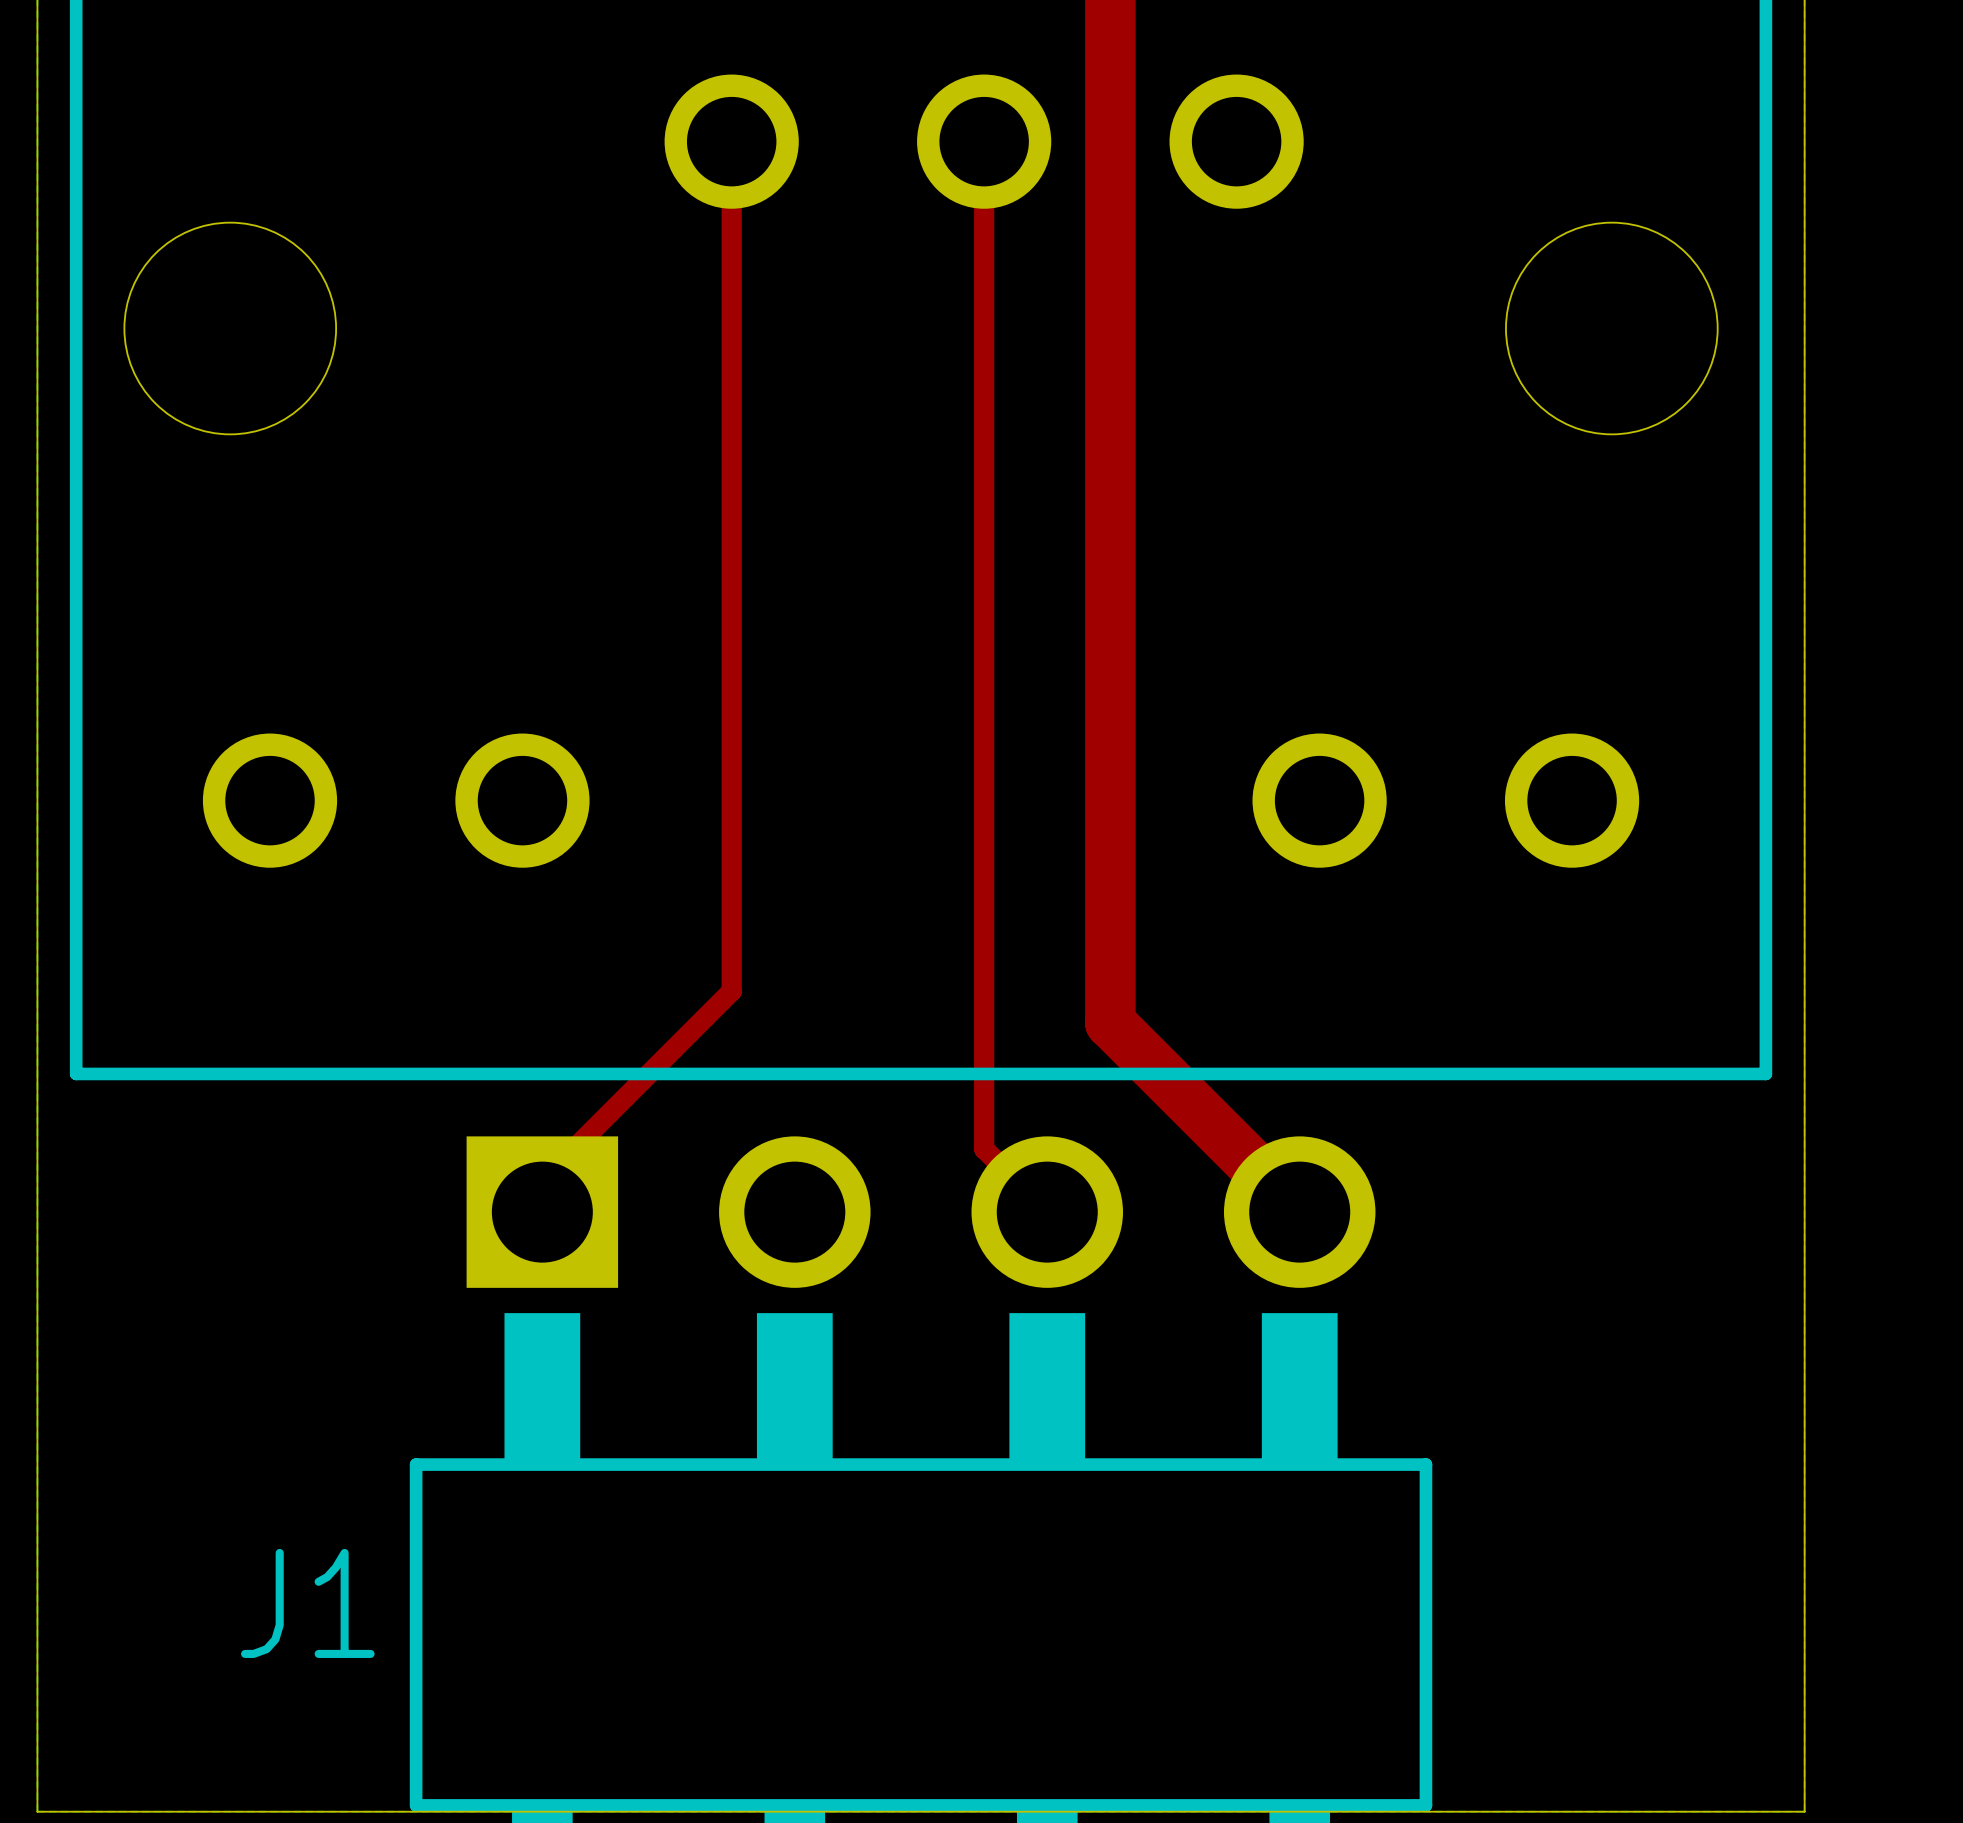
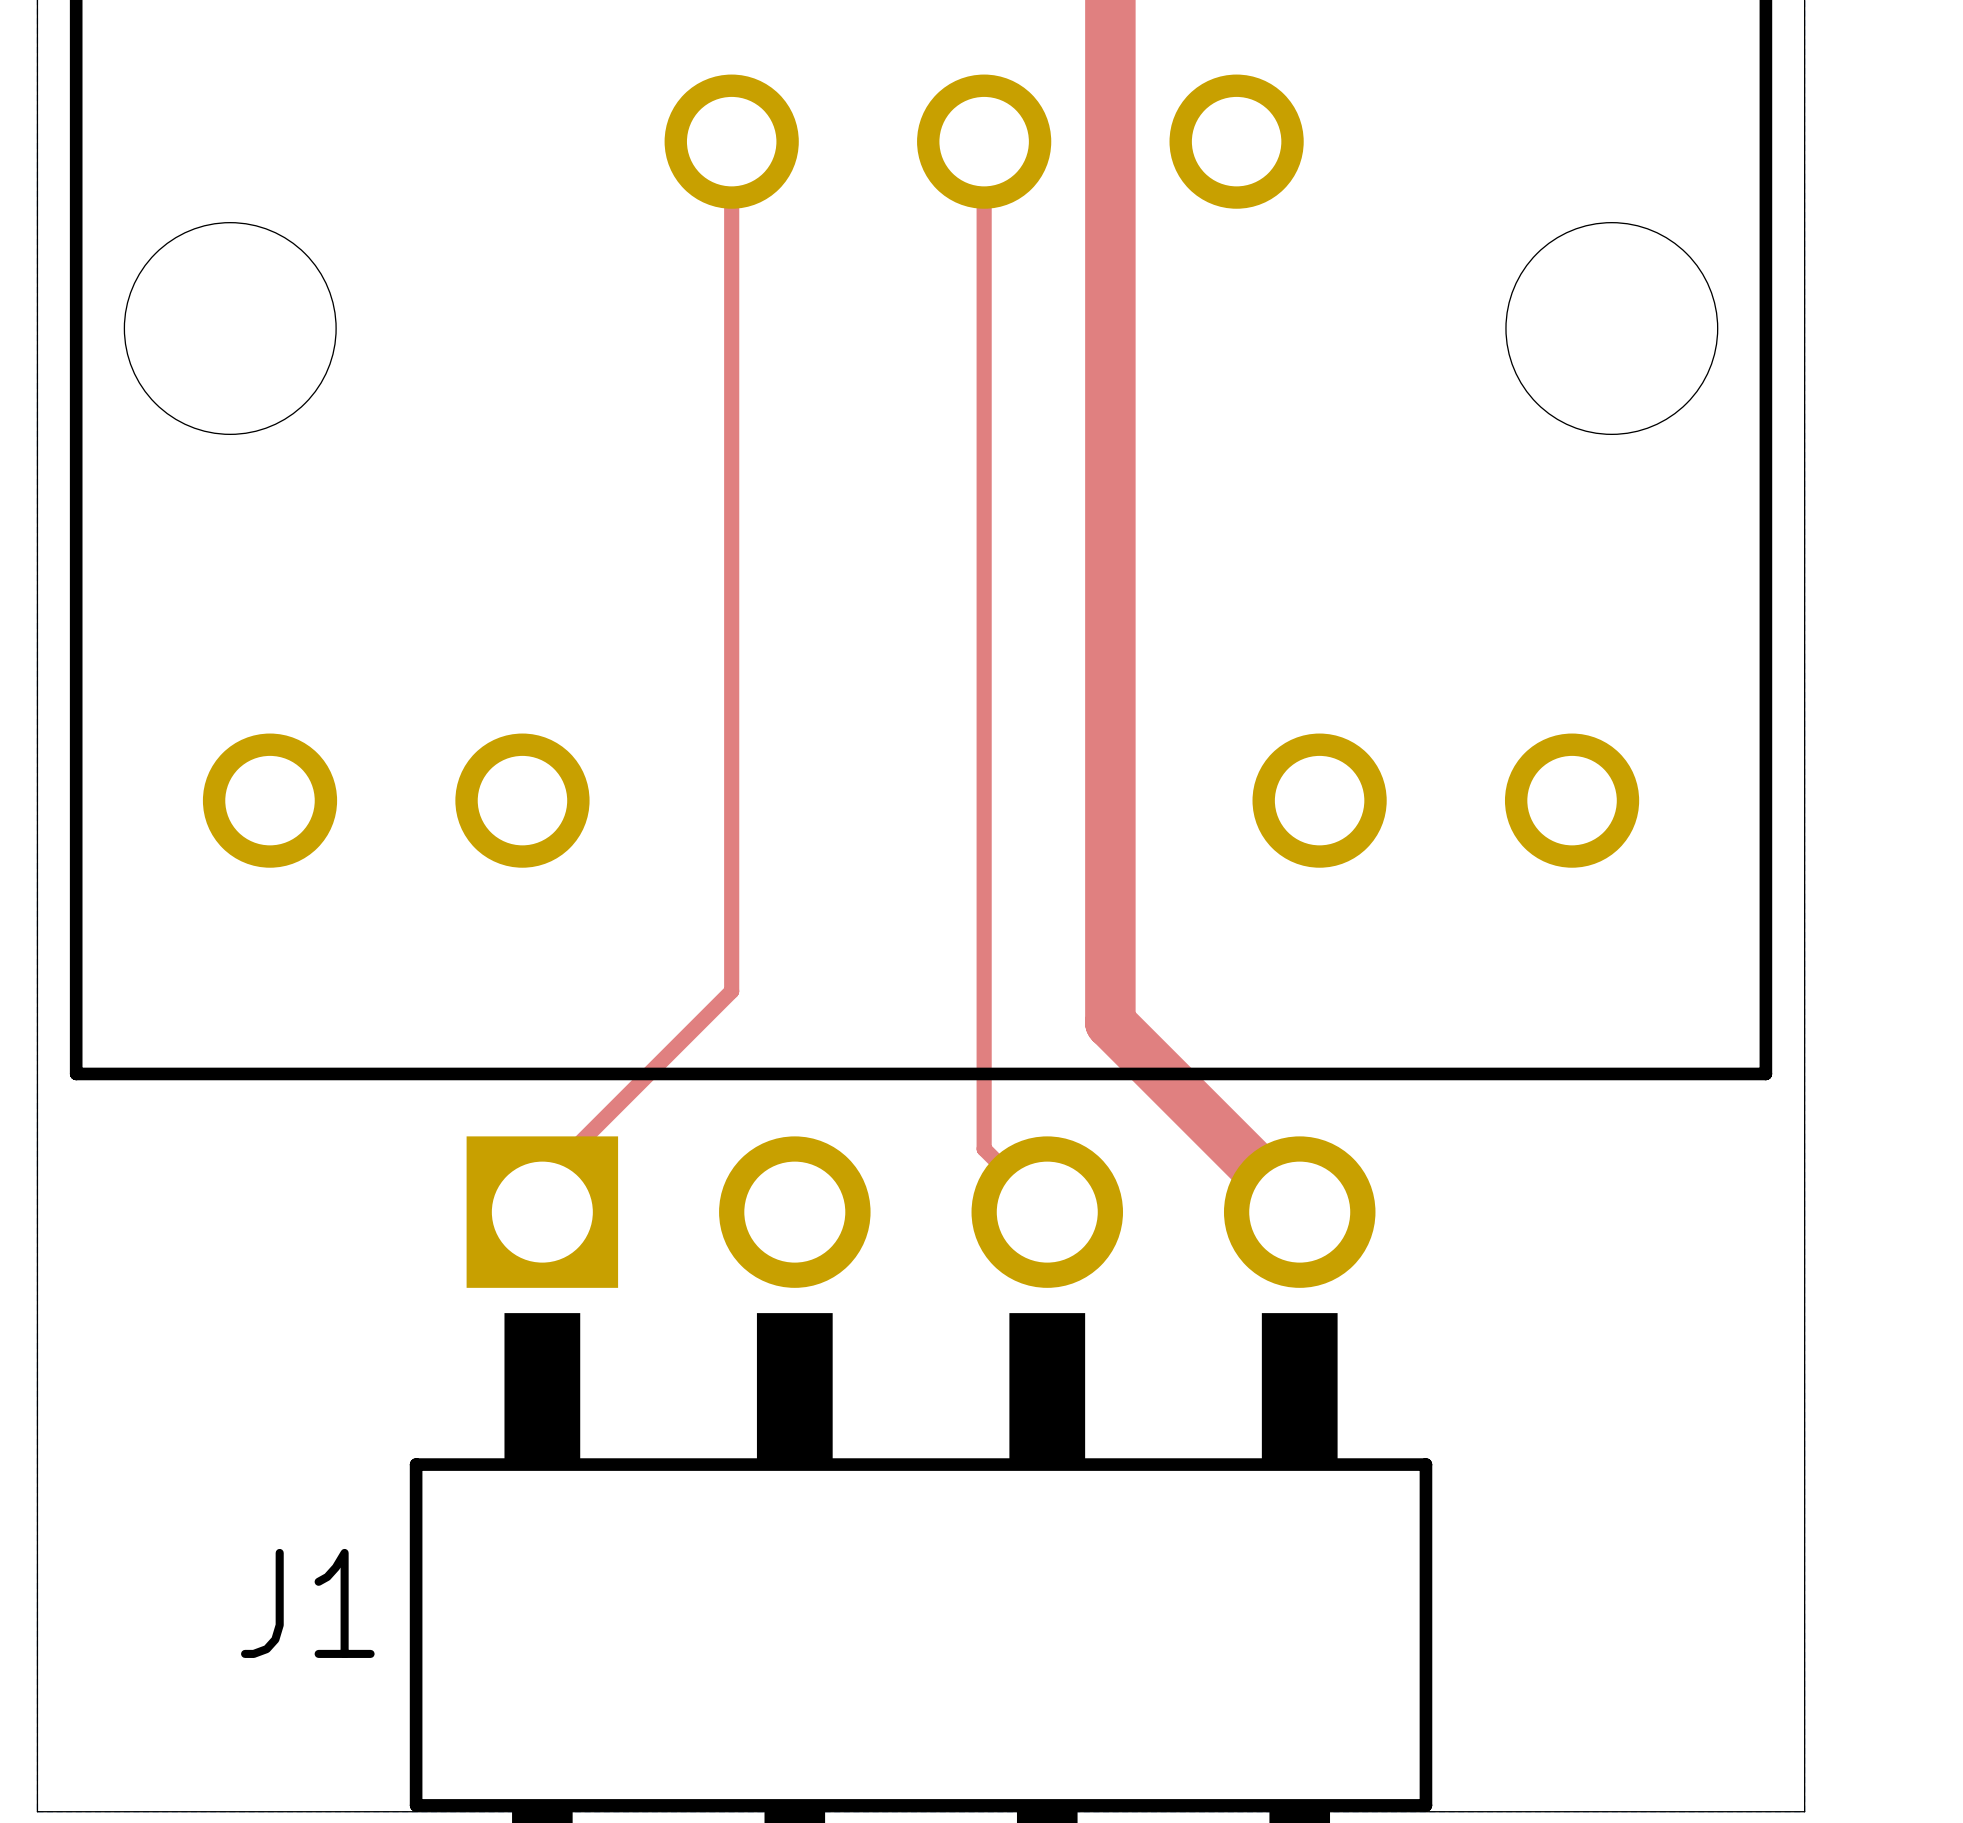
top track width: thick (731, 141) (731, 991) (542, 1180) -> thin (731, 141) (731, 991) (542, 1180)
top track width: thick (984, 141) (984, 1149) (1047, 1212) -> thin (984, 141) (984, 1149) (1047, 1212)

